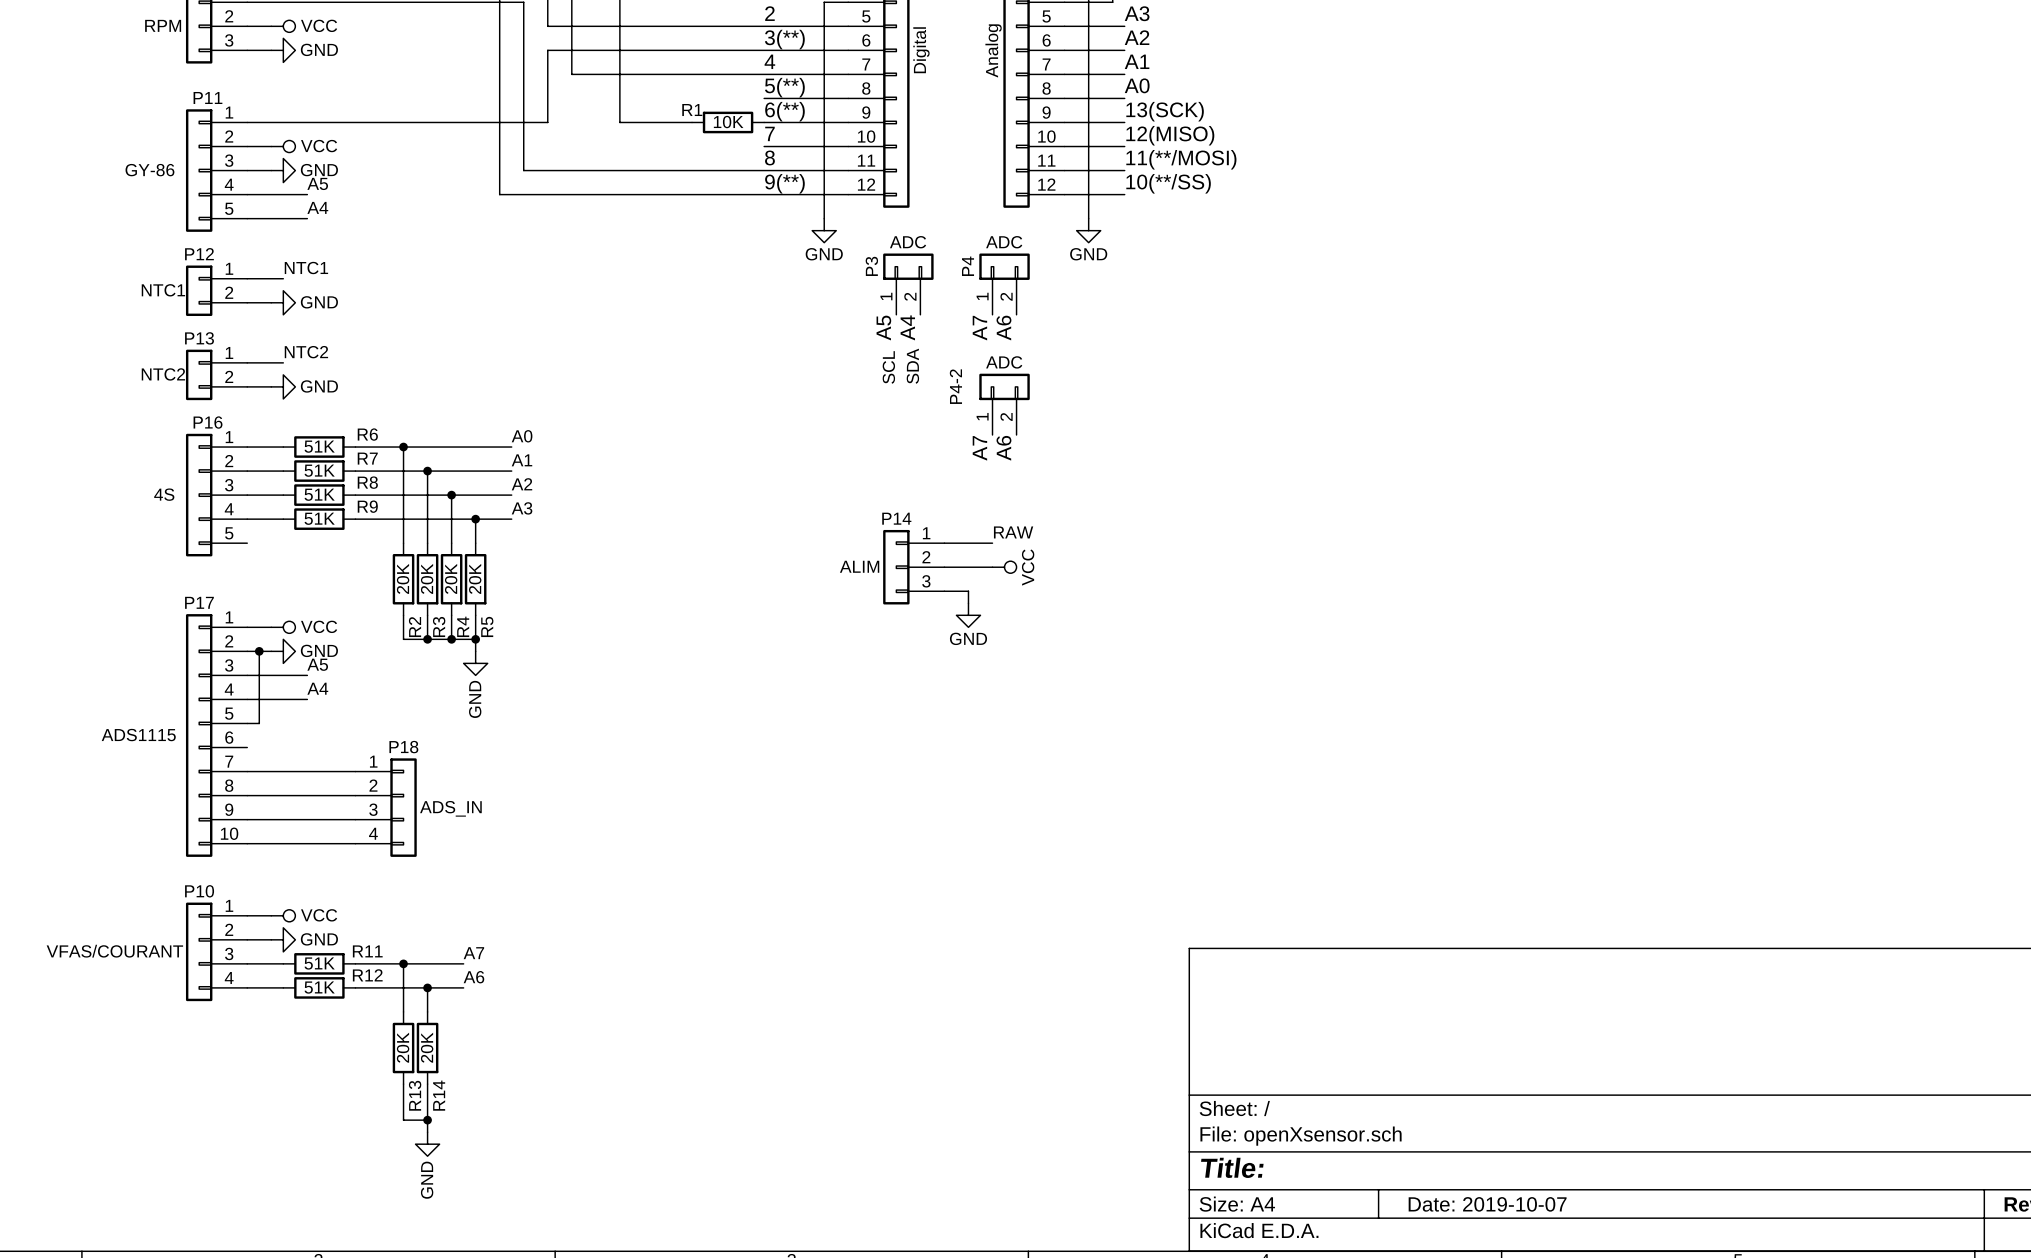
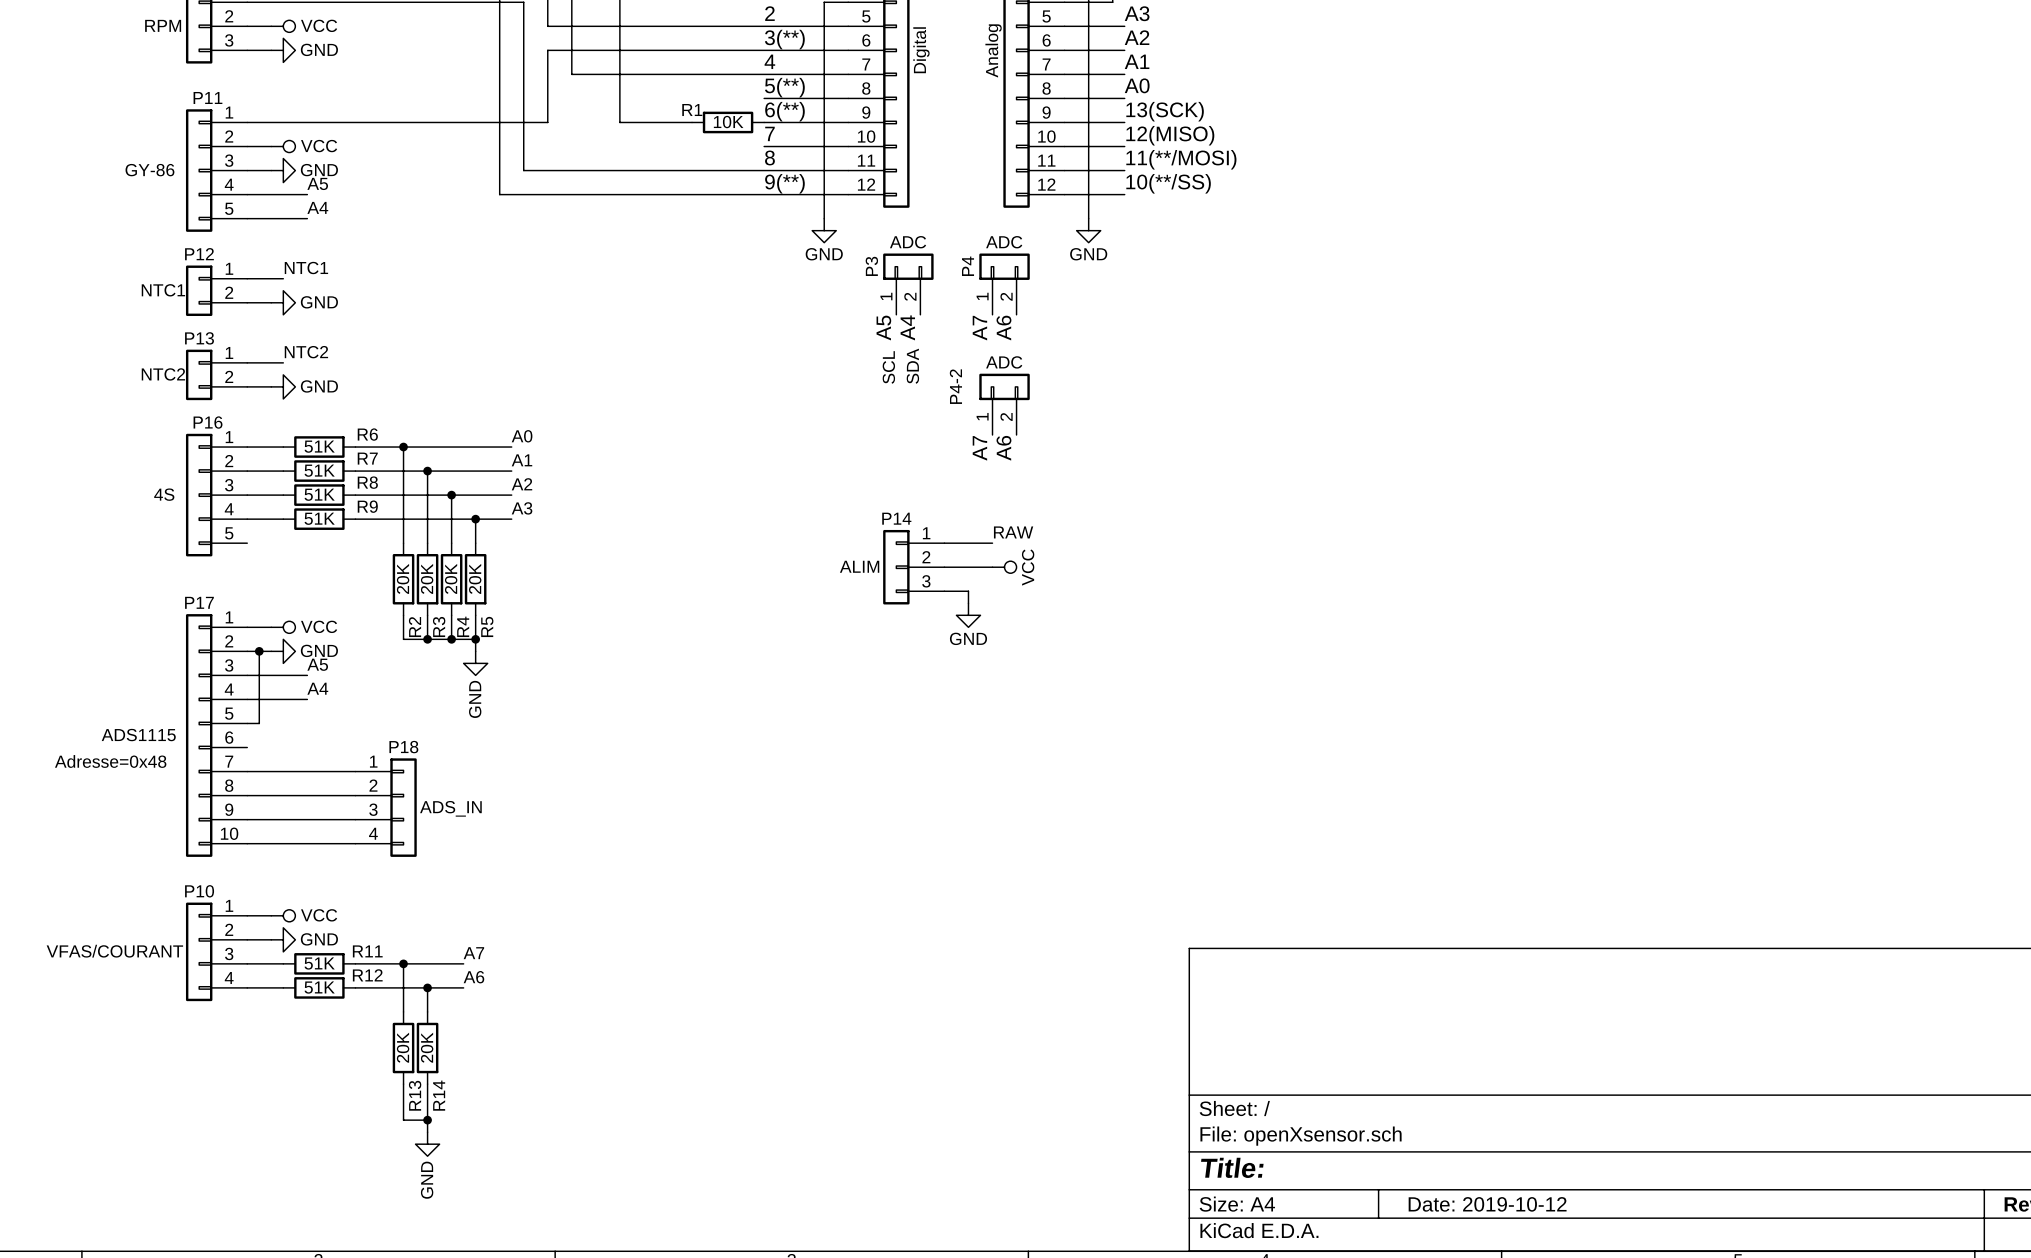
text: none -> Adresse=0x48 (110, 761)
title block: Date: 2019-10-07 (1487, 1204) -> Date: 2019-10-12 (1487, 1204)

